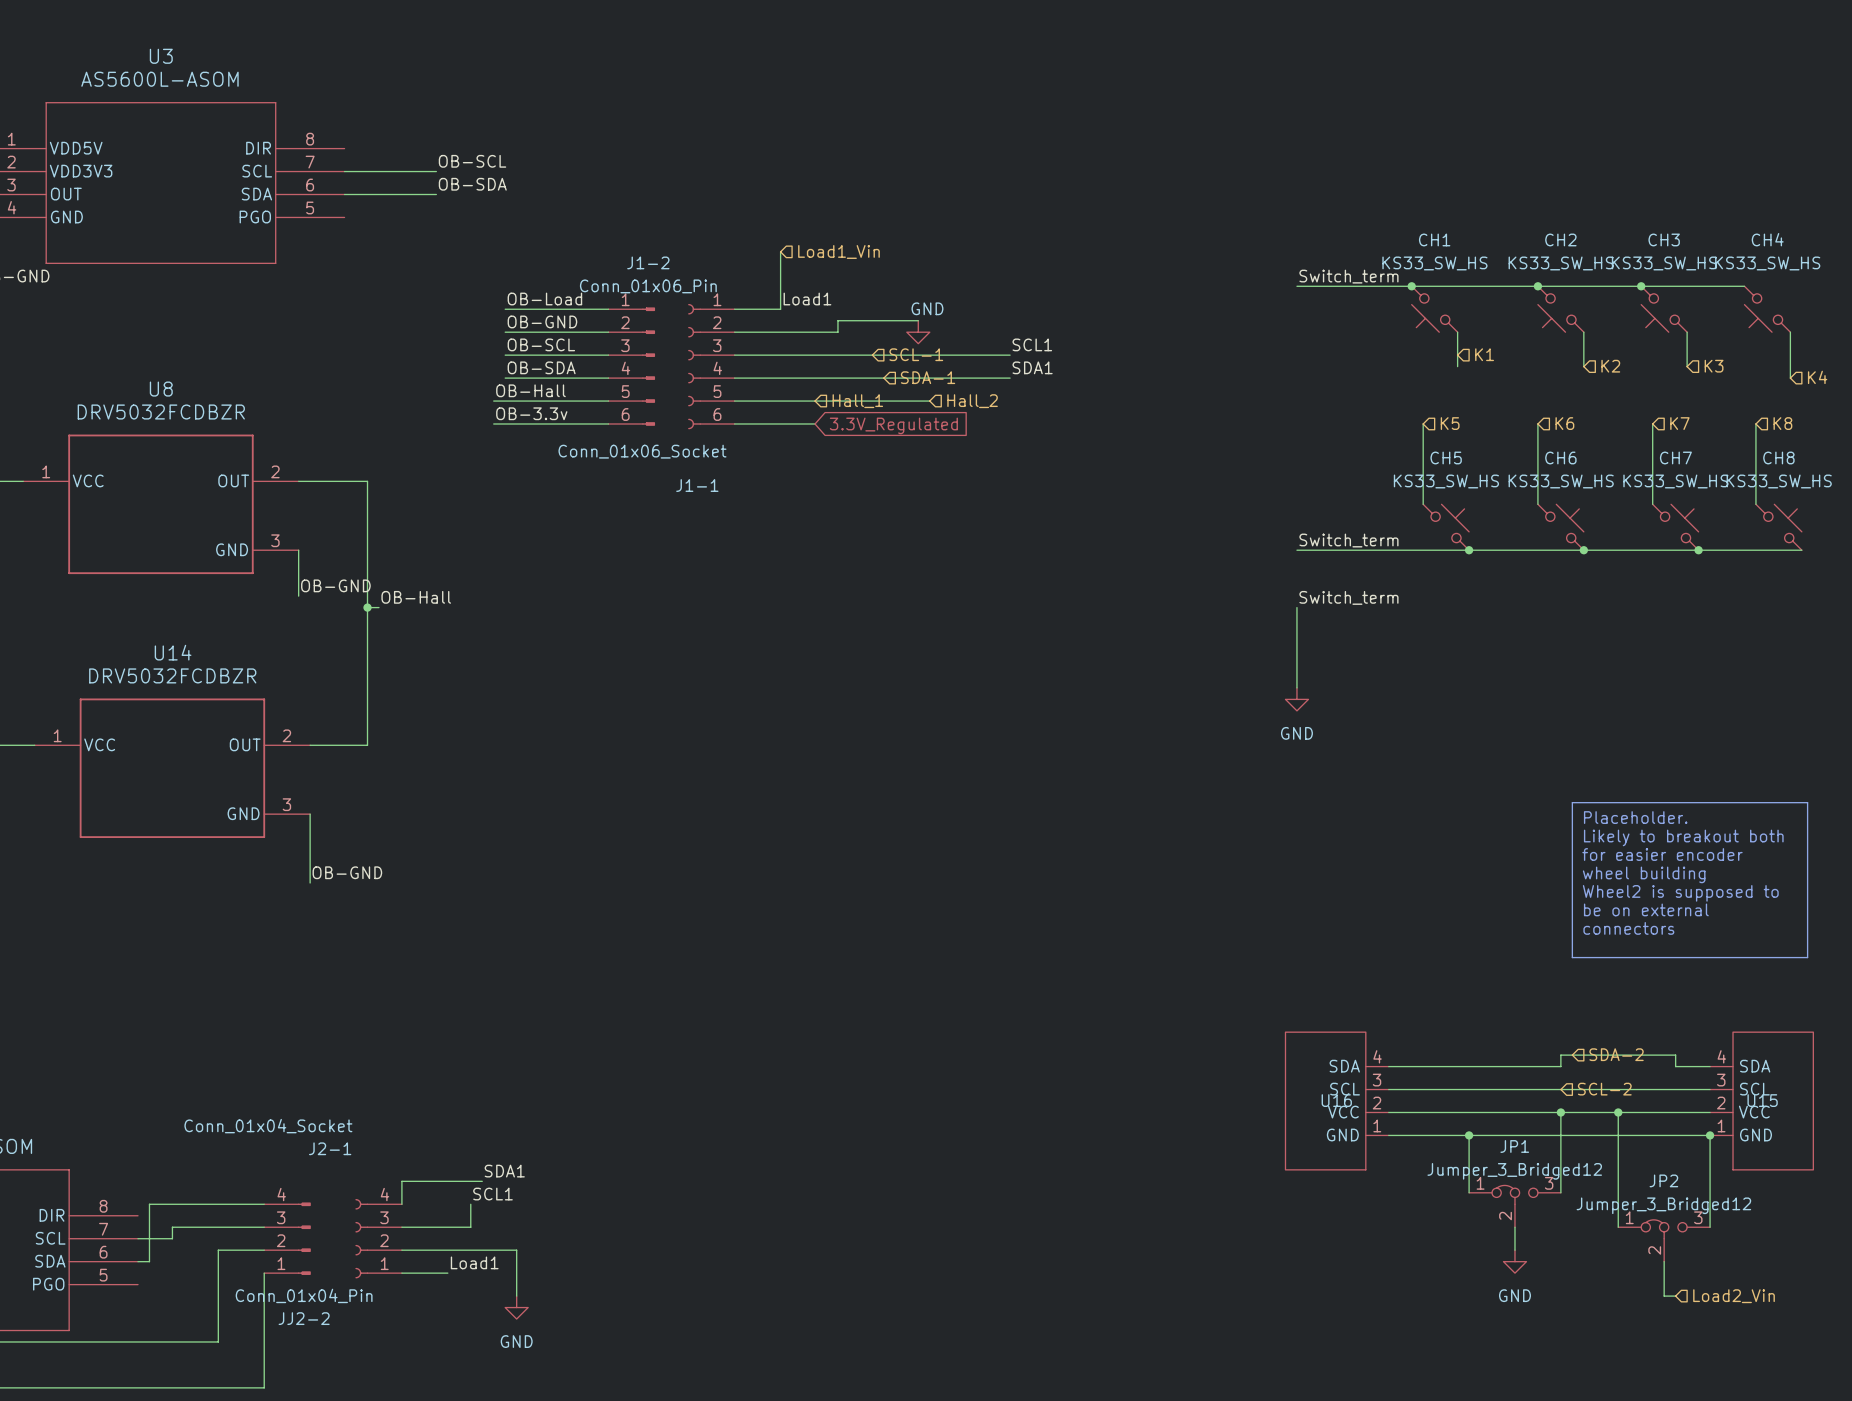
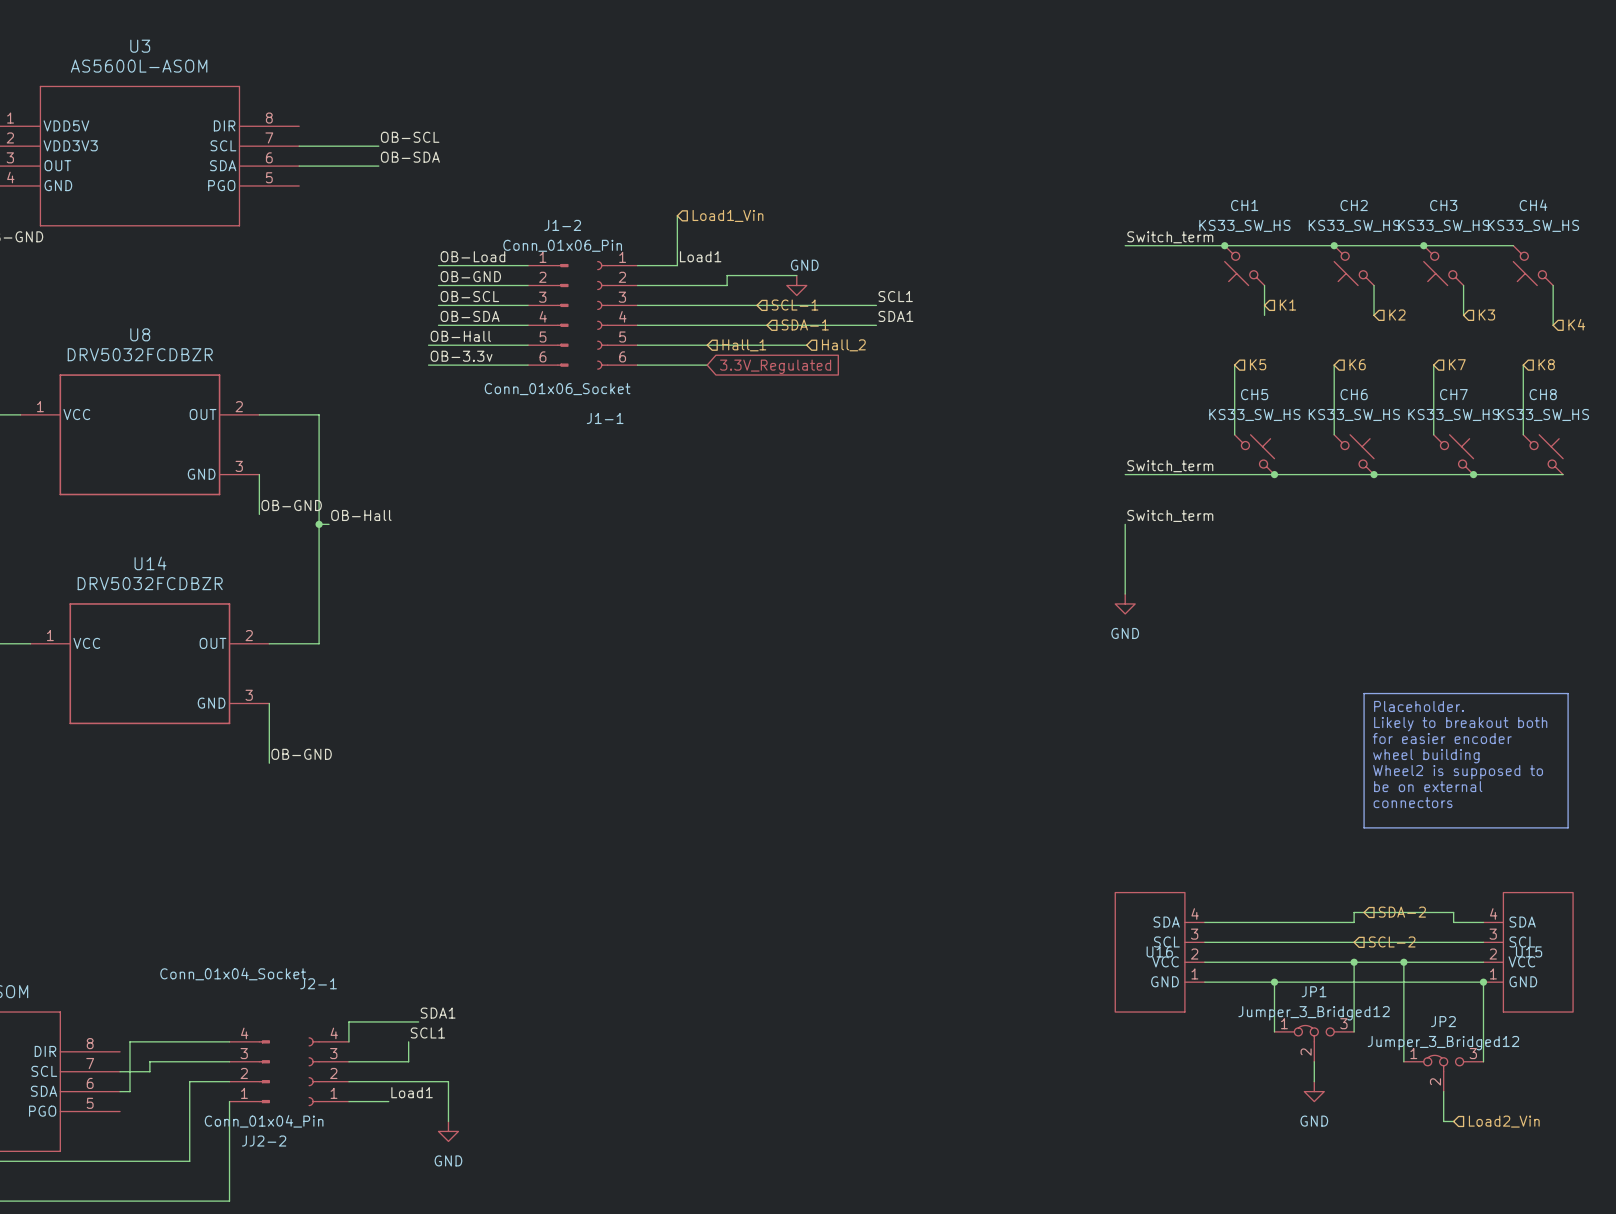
J2-1 name position: J2-1 (330, 1148) -> J2-1 (318, 983)

